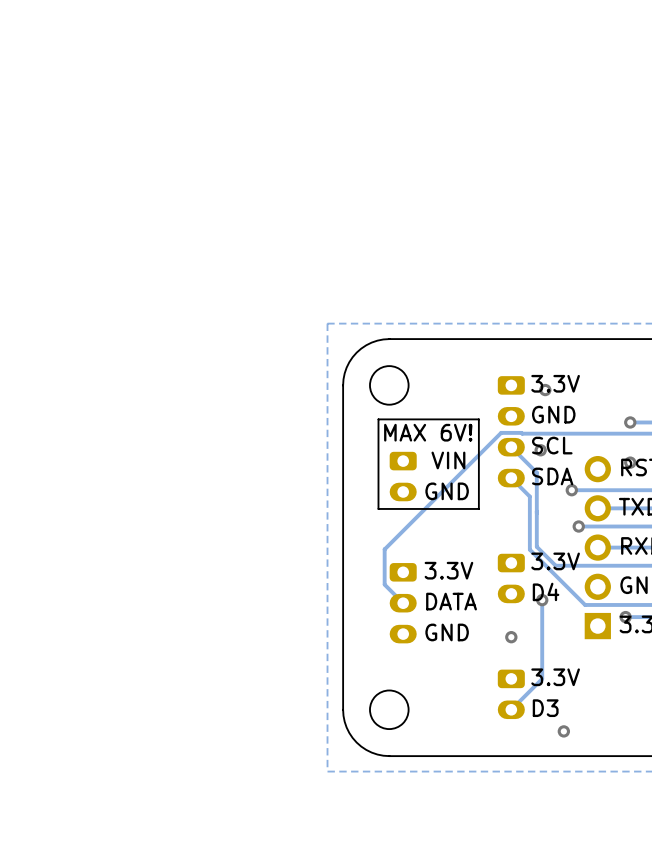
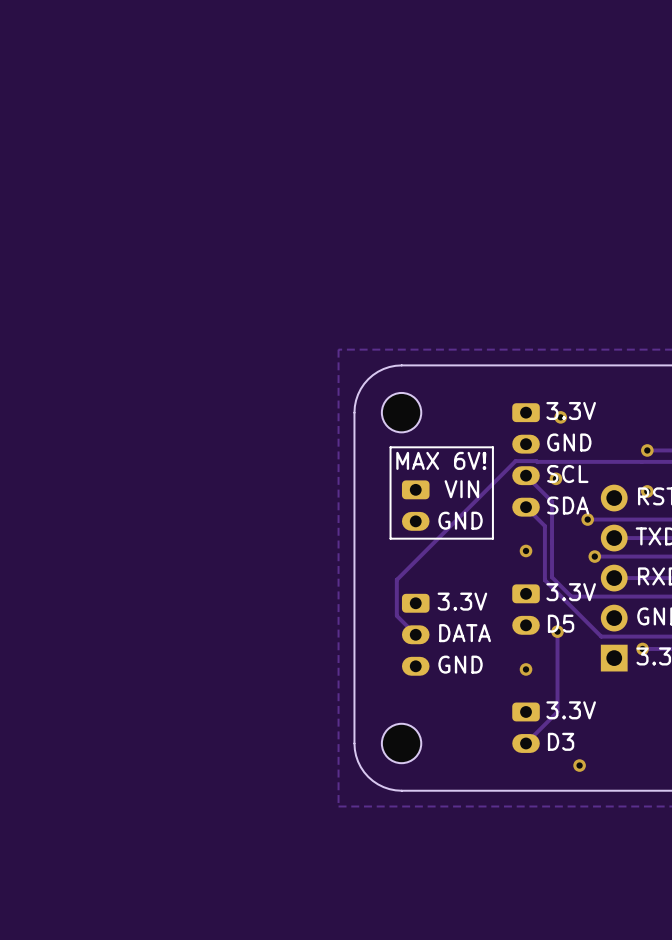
via: none -> (526, 550)
text: D4 (546, 591) -> D5 (561, 623)

